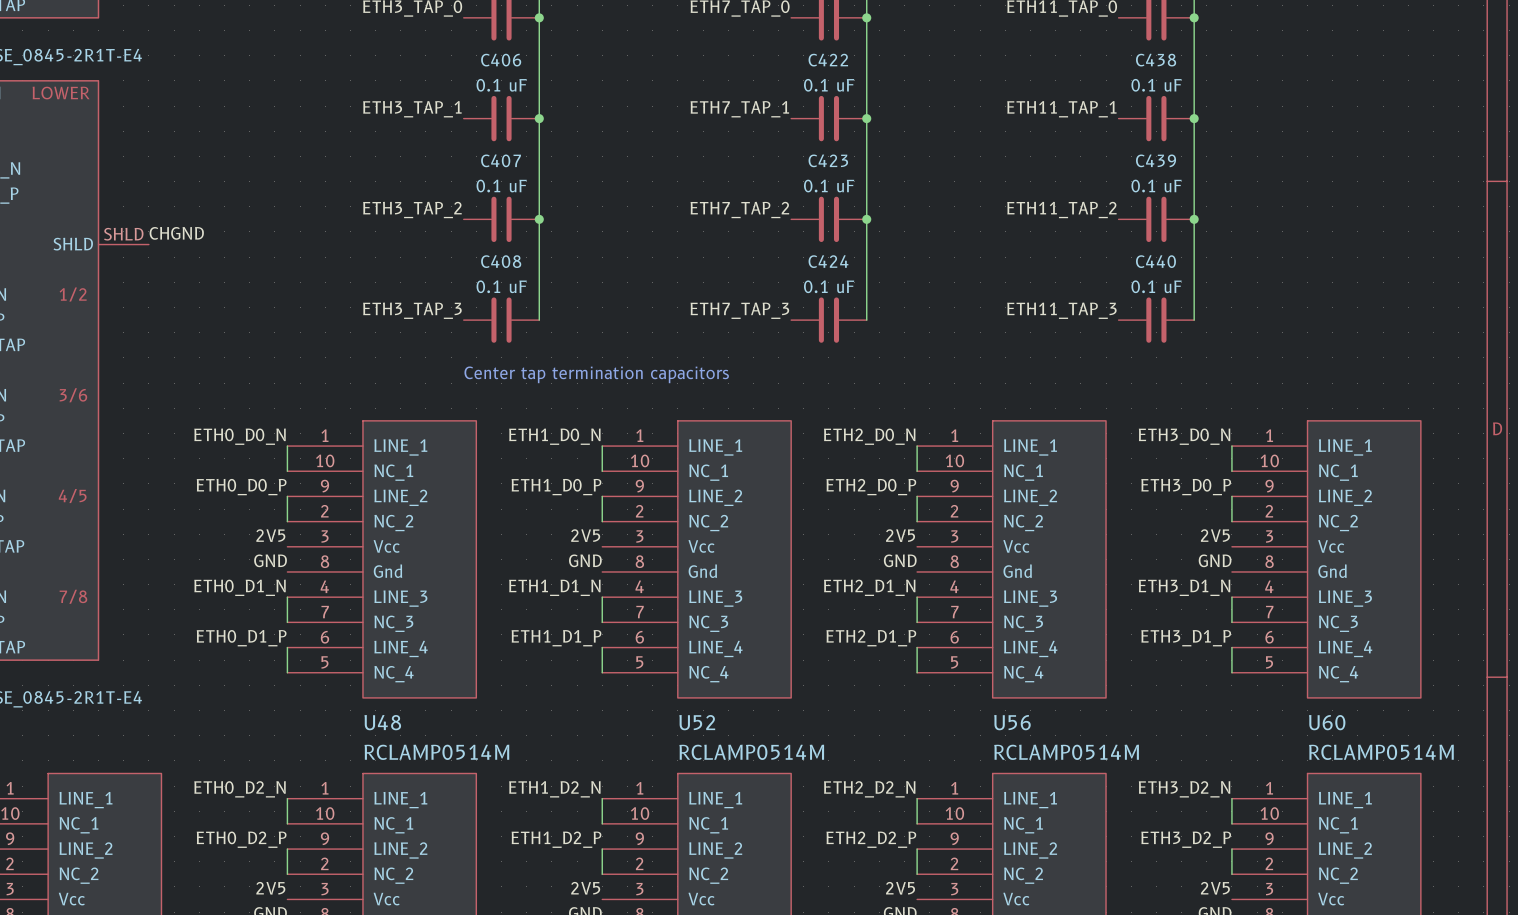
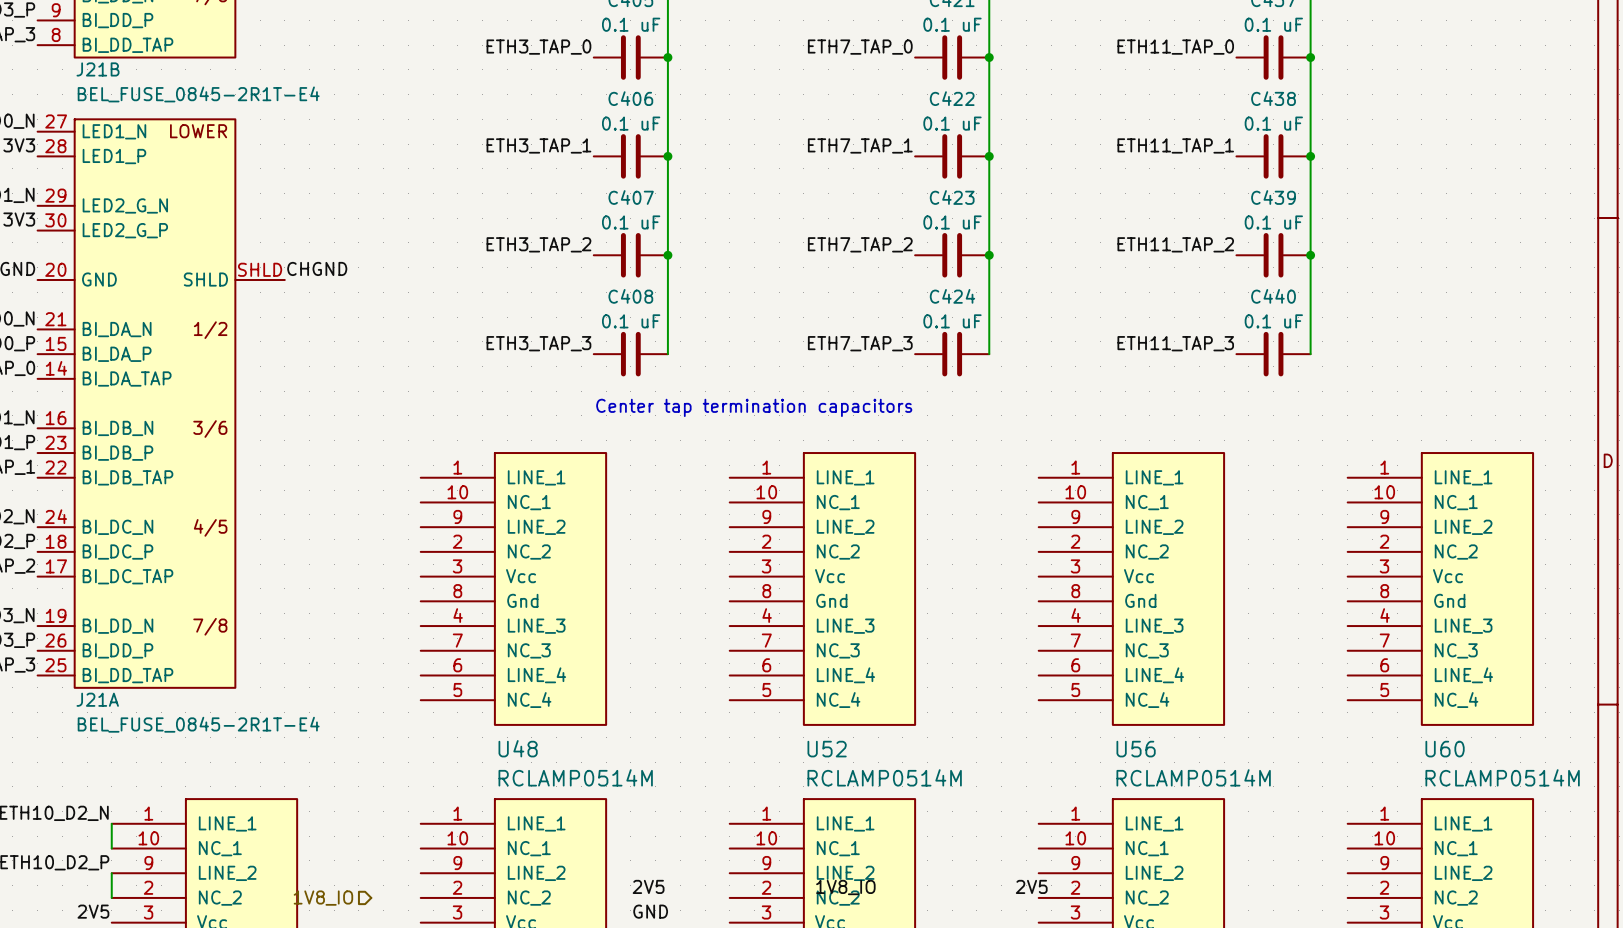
label: ETH0_D0_N (239, 436) -> none
label: ETH1_D0_N (554, 436) -> none
label: ETH2_D0_N (869, 436) -> none
label: ETH3_D0_N (1184, 436) -> none
wire: (287, 446) (287, 471) -> none
wire: (602, 446) (602, 471) -> none
wire: (917, 446) (917, 471) -> none
wire: (1231, 446) (1231, 471) -> none
label: ETH0_D0_P (241, 487) -> none
label: ETH1_D0_P (556, 487) -> none
label: ETH2_D0_P (871, 487) -> none
label: ETH3_D0_P (1186, 487) -> none
wire: (287, 496) (287, 521) -> none
wire: (602, 496) (602, 521) -> none
wire: (917, 496) (917, 521) -> none
wire: (1231, 496) (1231, 521) -> none
label: 2V5 (270, 535) -> none
label: 2V5 (585, 535) -> none
label: 2V5 (900, 535) -> none
label: 2V5 (1215, 535) -> none
label: GND (270, 560) -> none
label: GND (585, 560) -> none
label: GND (900, 560) -> none
label: GND (1215, 560) -> none
label: ETH0_D1_N (239, 587) -> none
label: ETH1_D1_N (554, 587) -> none
label: ETH2_D1_N (869, 587) -> none
label: ETH3_D1_N (1184, 587) -> none
wire: (287, 597) (287, 622) -> none
wire: (602, 597) (602, 622) -> none
wire: (917, 597) (917, 622) -> none
wire: (1231, 597) (1231, 622) -> none
label: ETH0_D1_P (241, 638) -> none
label: ETH1_D1_P (556, 638) -> none
label: ETH2_D1_P (871, 638) -> none
label: ETH3_D1_P (1186, 638) -> none
wire: (287, 647) (287, 672) -> none
wire: (602, 647) (602, 672) -> none
wire: (917, 647) (917, 672) -> none
wire: (1231, 647) (1231, 672) -> none
label: ETH0_D2_N (239, 789) -> none
label: ETH1_D2_N (554, 789) -> none
label: ETH2_D2_N (869, 789) -> none
label: ETH3_D2_N (1184, 789) -> none
wire: (287, 798) (287, 823) -> none
wire: (602, 798) (602, 823) -> none
wire: (917, 798) (917, 823) -> none
wire: (1231, 798) (1231, 823) -> none
label: ETH0_D2_P (241, 839) -> none
label: ETH1_D2_P (556, 839) -> none
label: ETH2_D2_P (871, 839) -> none
label: ETH3_D2_P (1186, 839) -> none
wire: (287, 849) (287, 874) -> none
wire: (602, 849) (602, 874) -> none
wire: (917, 849) (917, 874) -> none
wire: (1231, 849) (1231, 874) -> none
label: none -> 2V5 (648, 886)
label: none -> 1V8_IO (845, 887)
hierarchical label: none -> 1V8_IO (323, 898)
label: 2V5 (270, 888) -> none
label: none -> GND (650, 911)
label: 2V5 (585, 888) -> none
label position: 2V5 (900, 888) -> 2V5 (1031, 886)
label: 2V5 (1215, 888) -> none

